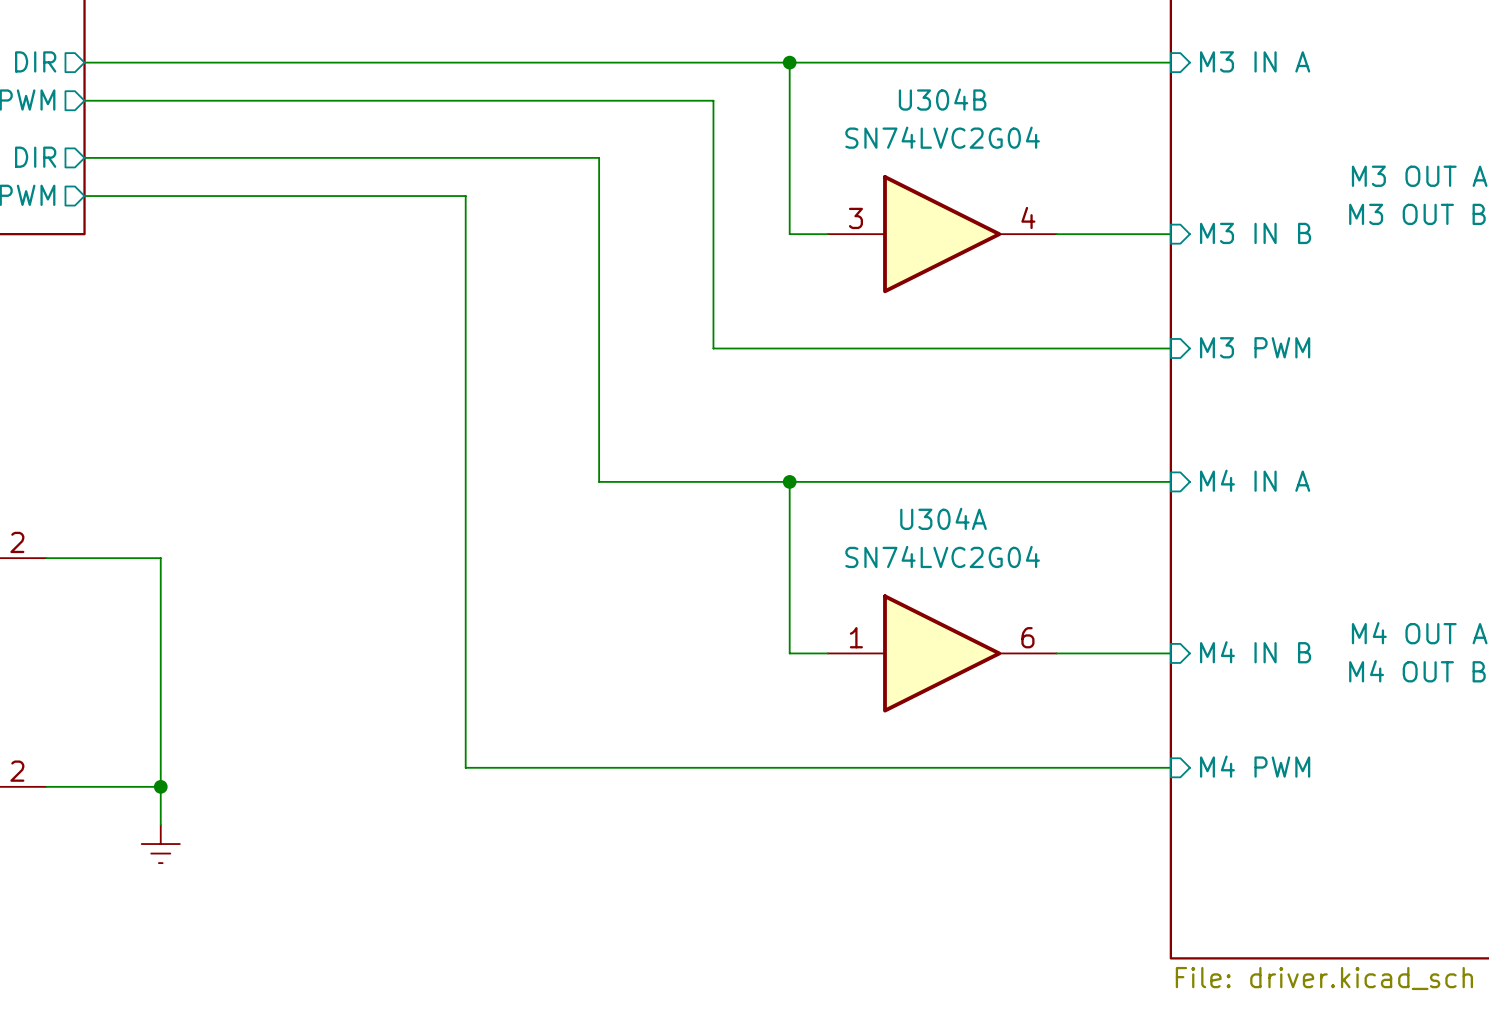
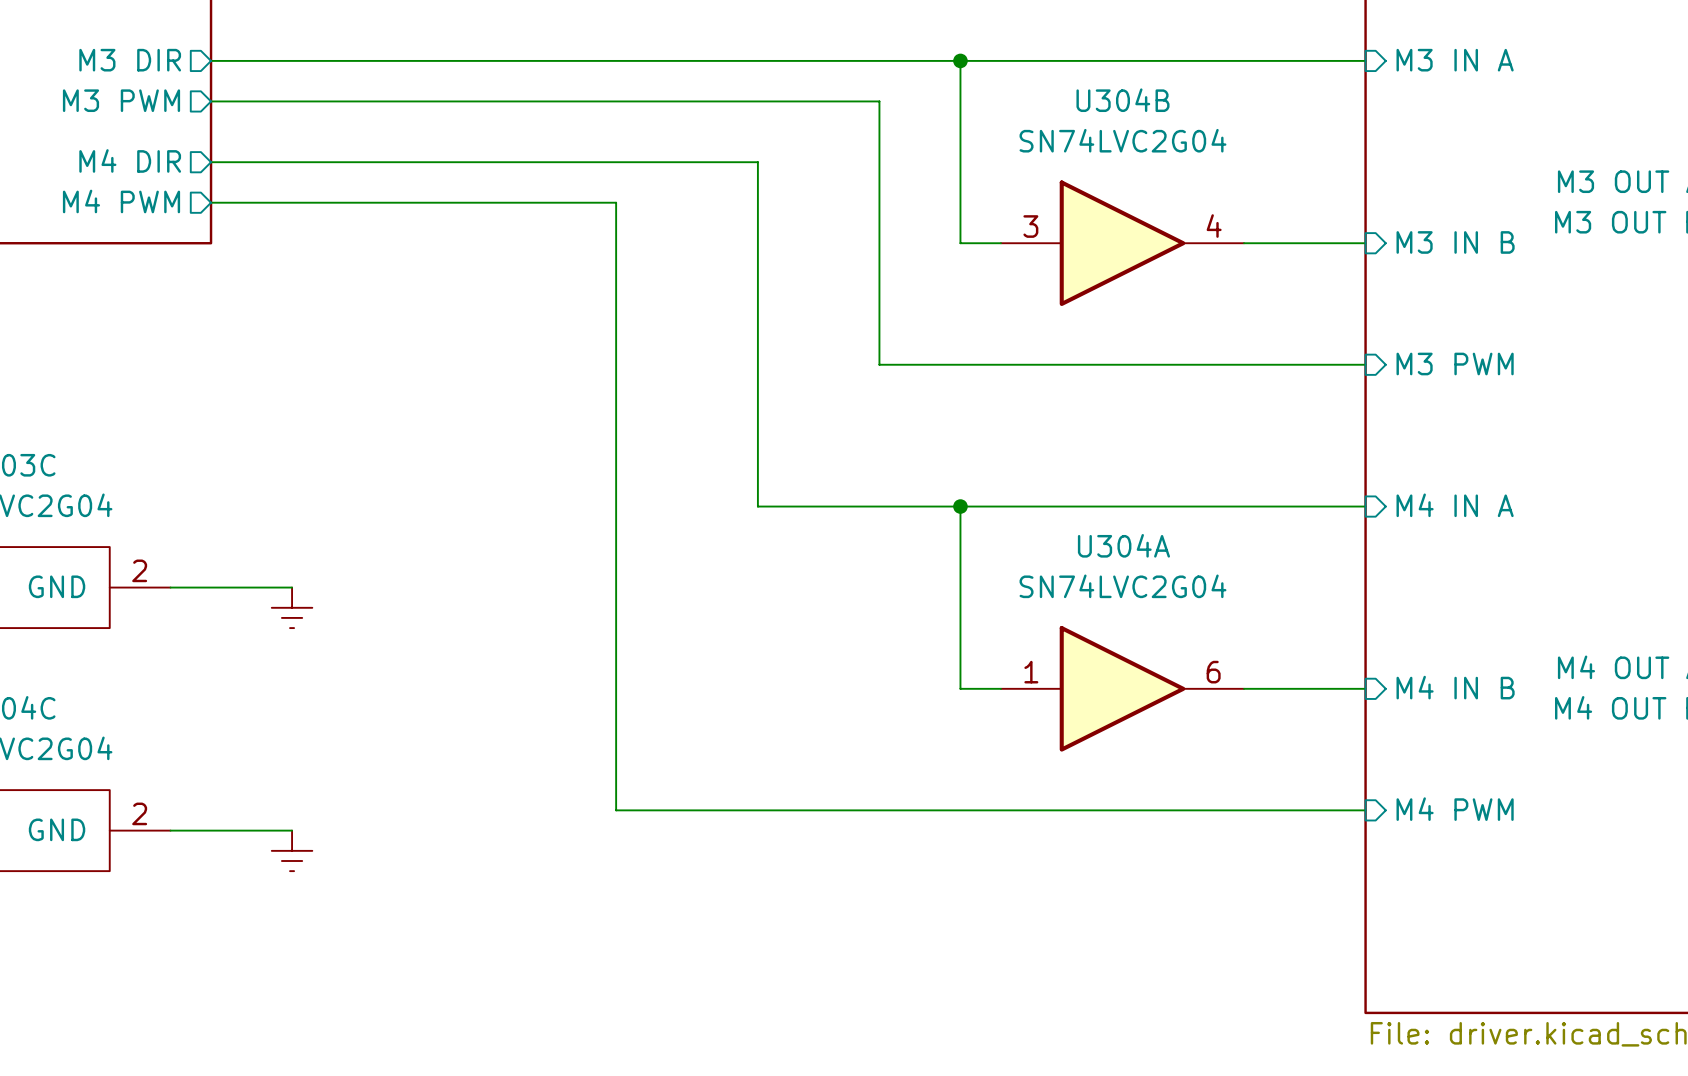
wire: (160, 558) (160, 824) -> none
power symbol: none -> (292, 607)
junction: (160, 786) -> none
power symbol position: (160, 844) -> (292, 850)

